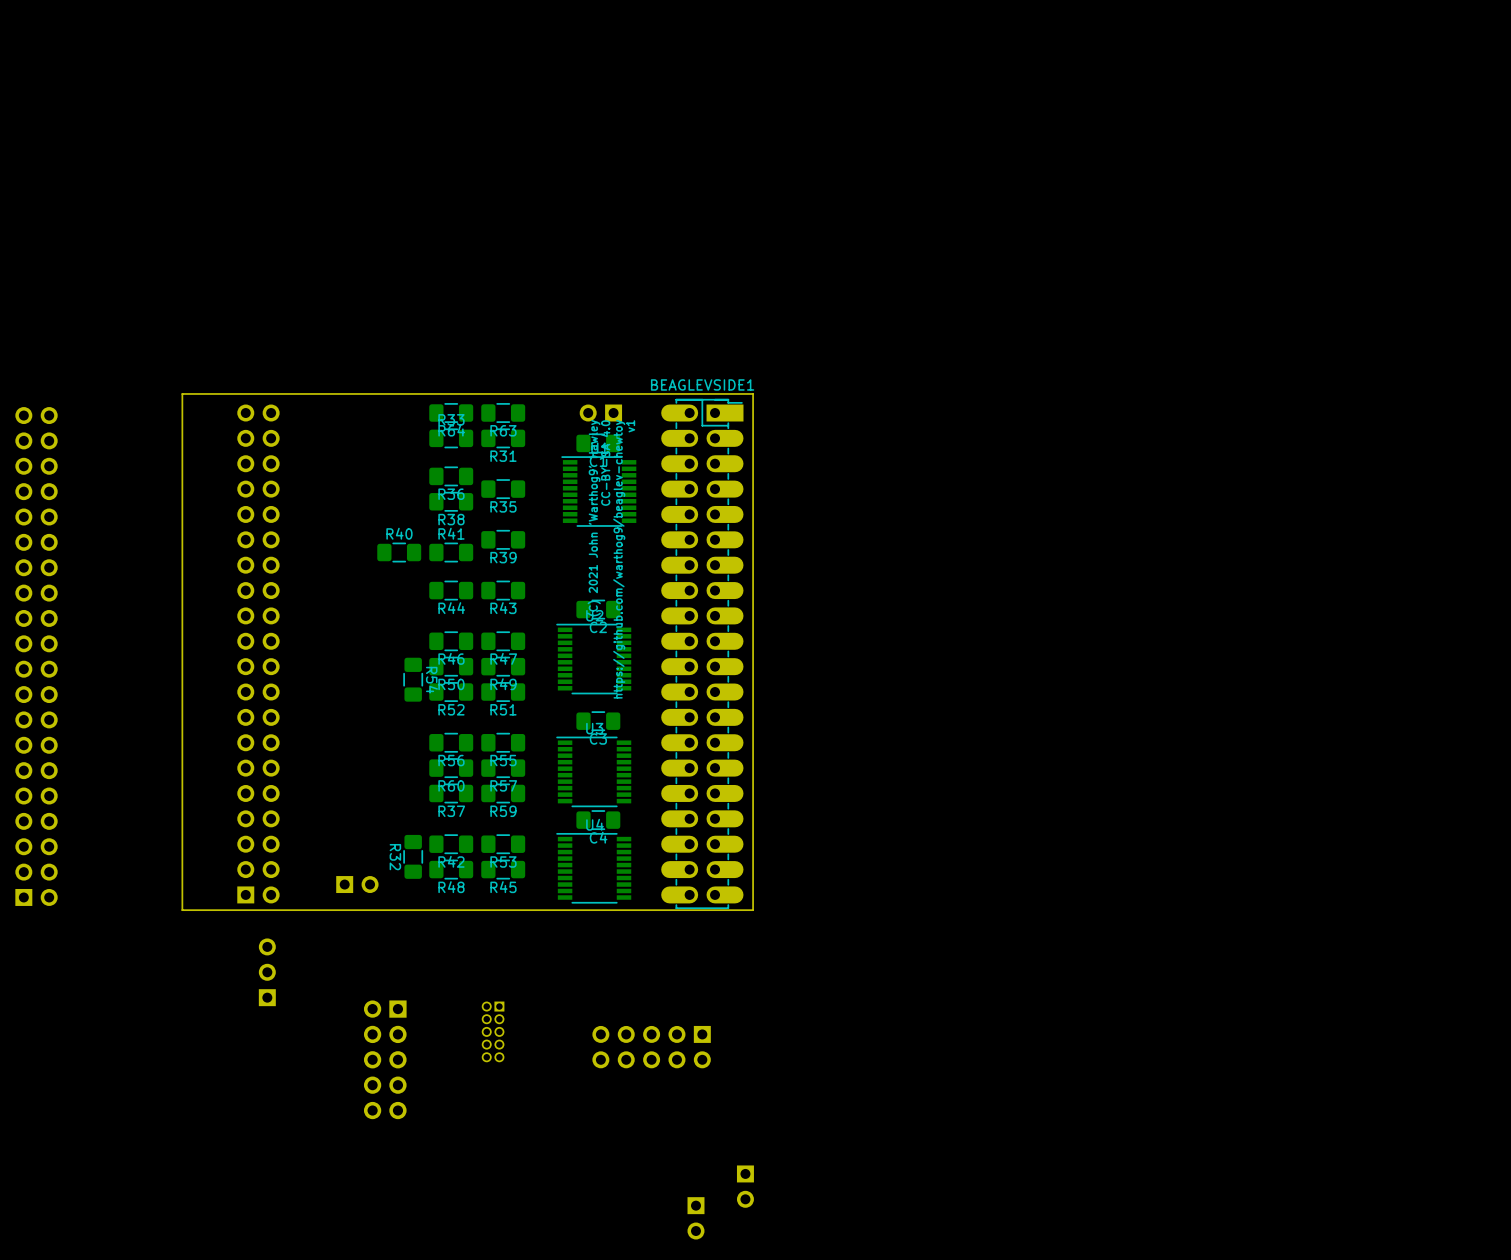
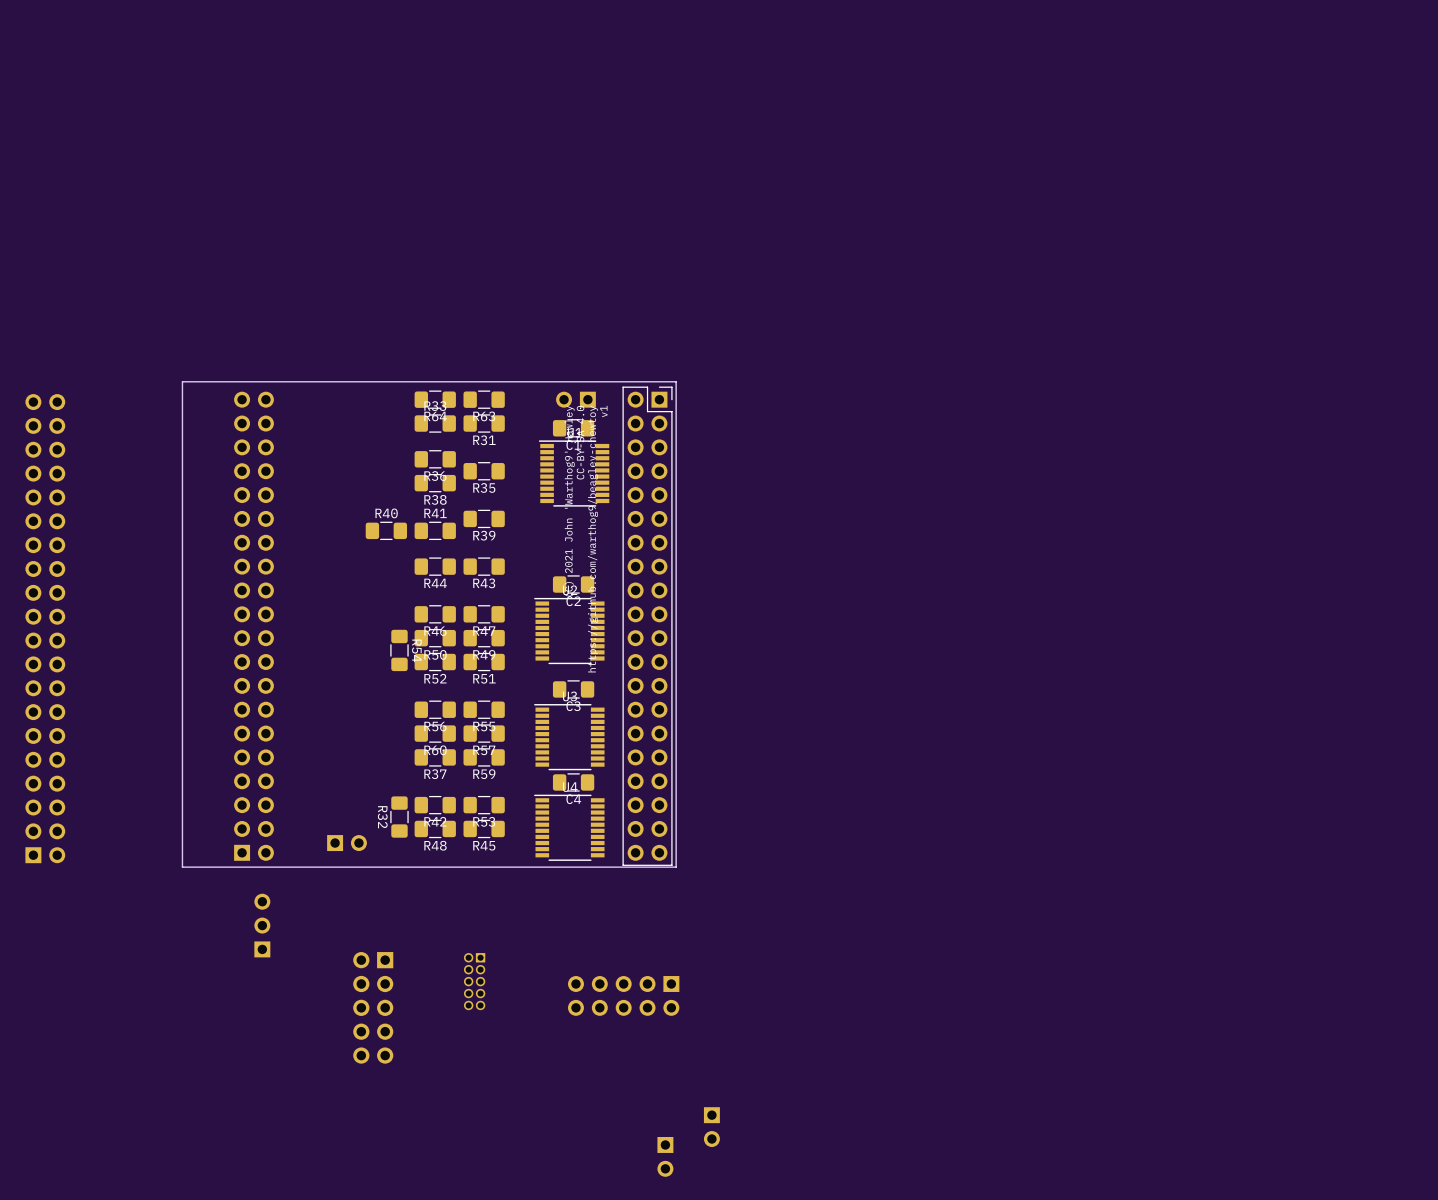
board edge: (707, 393) (753, 393) (753, 910) (707, 910) -> (676, 381) (676, 867)
part: none -> (647, 626)
BEAGLEVSIDE1: (702, 653) -> none

